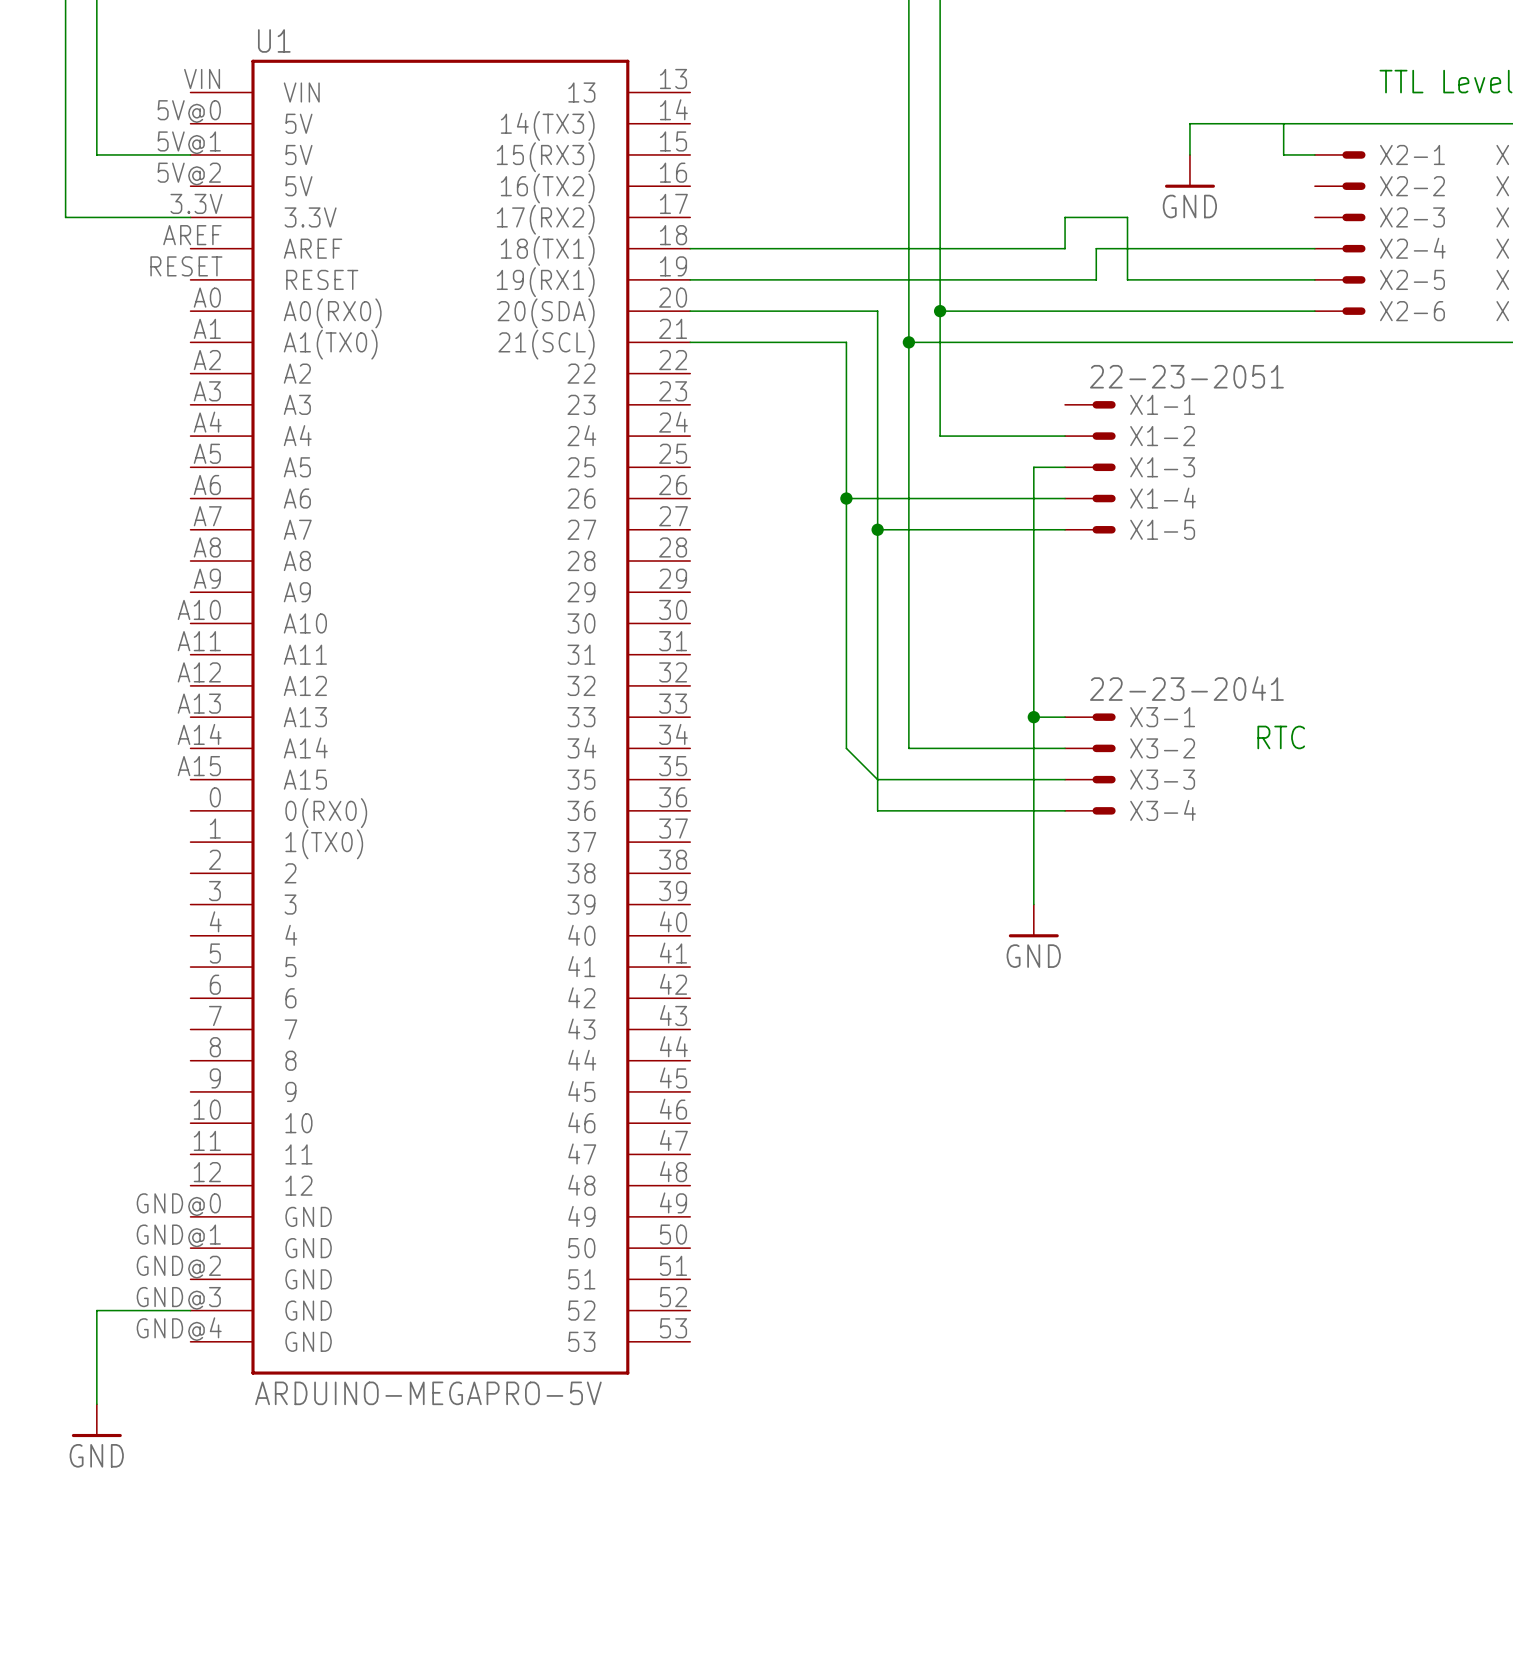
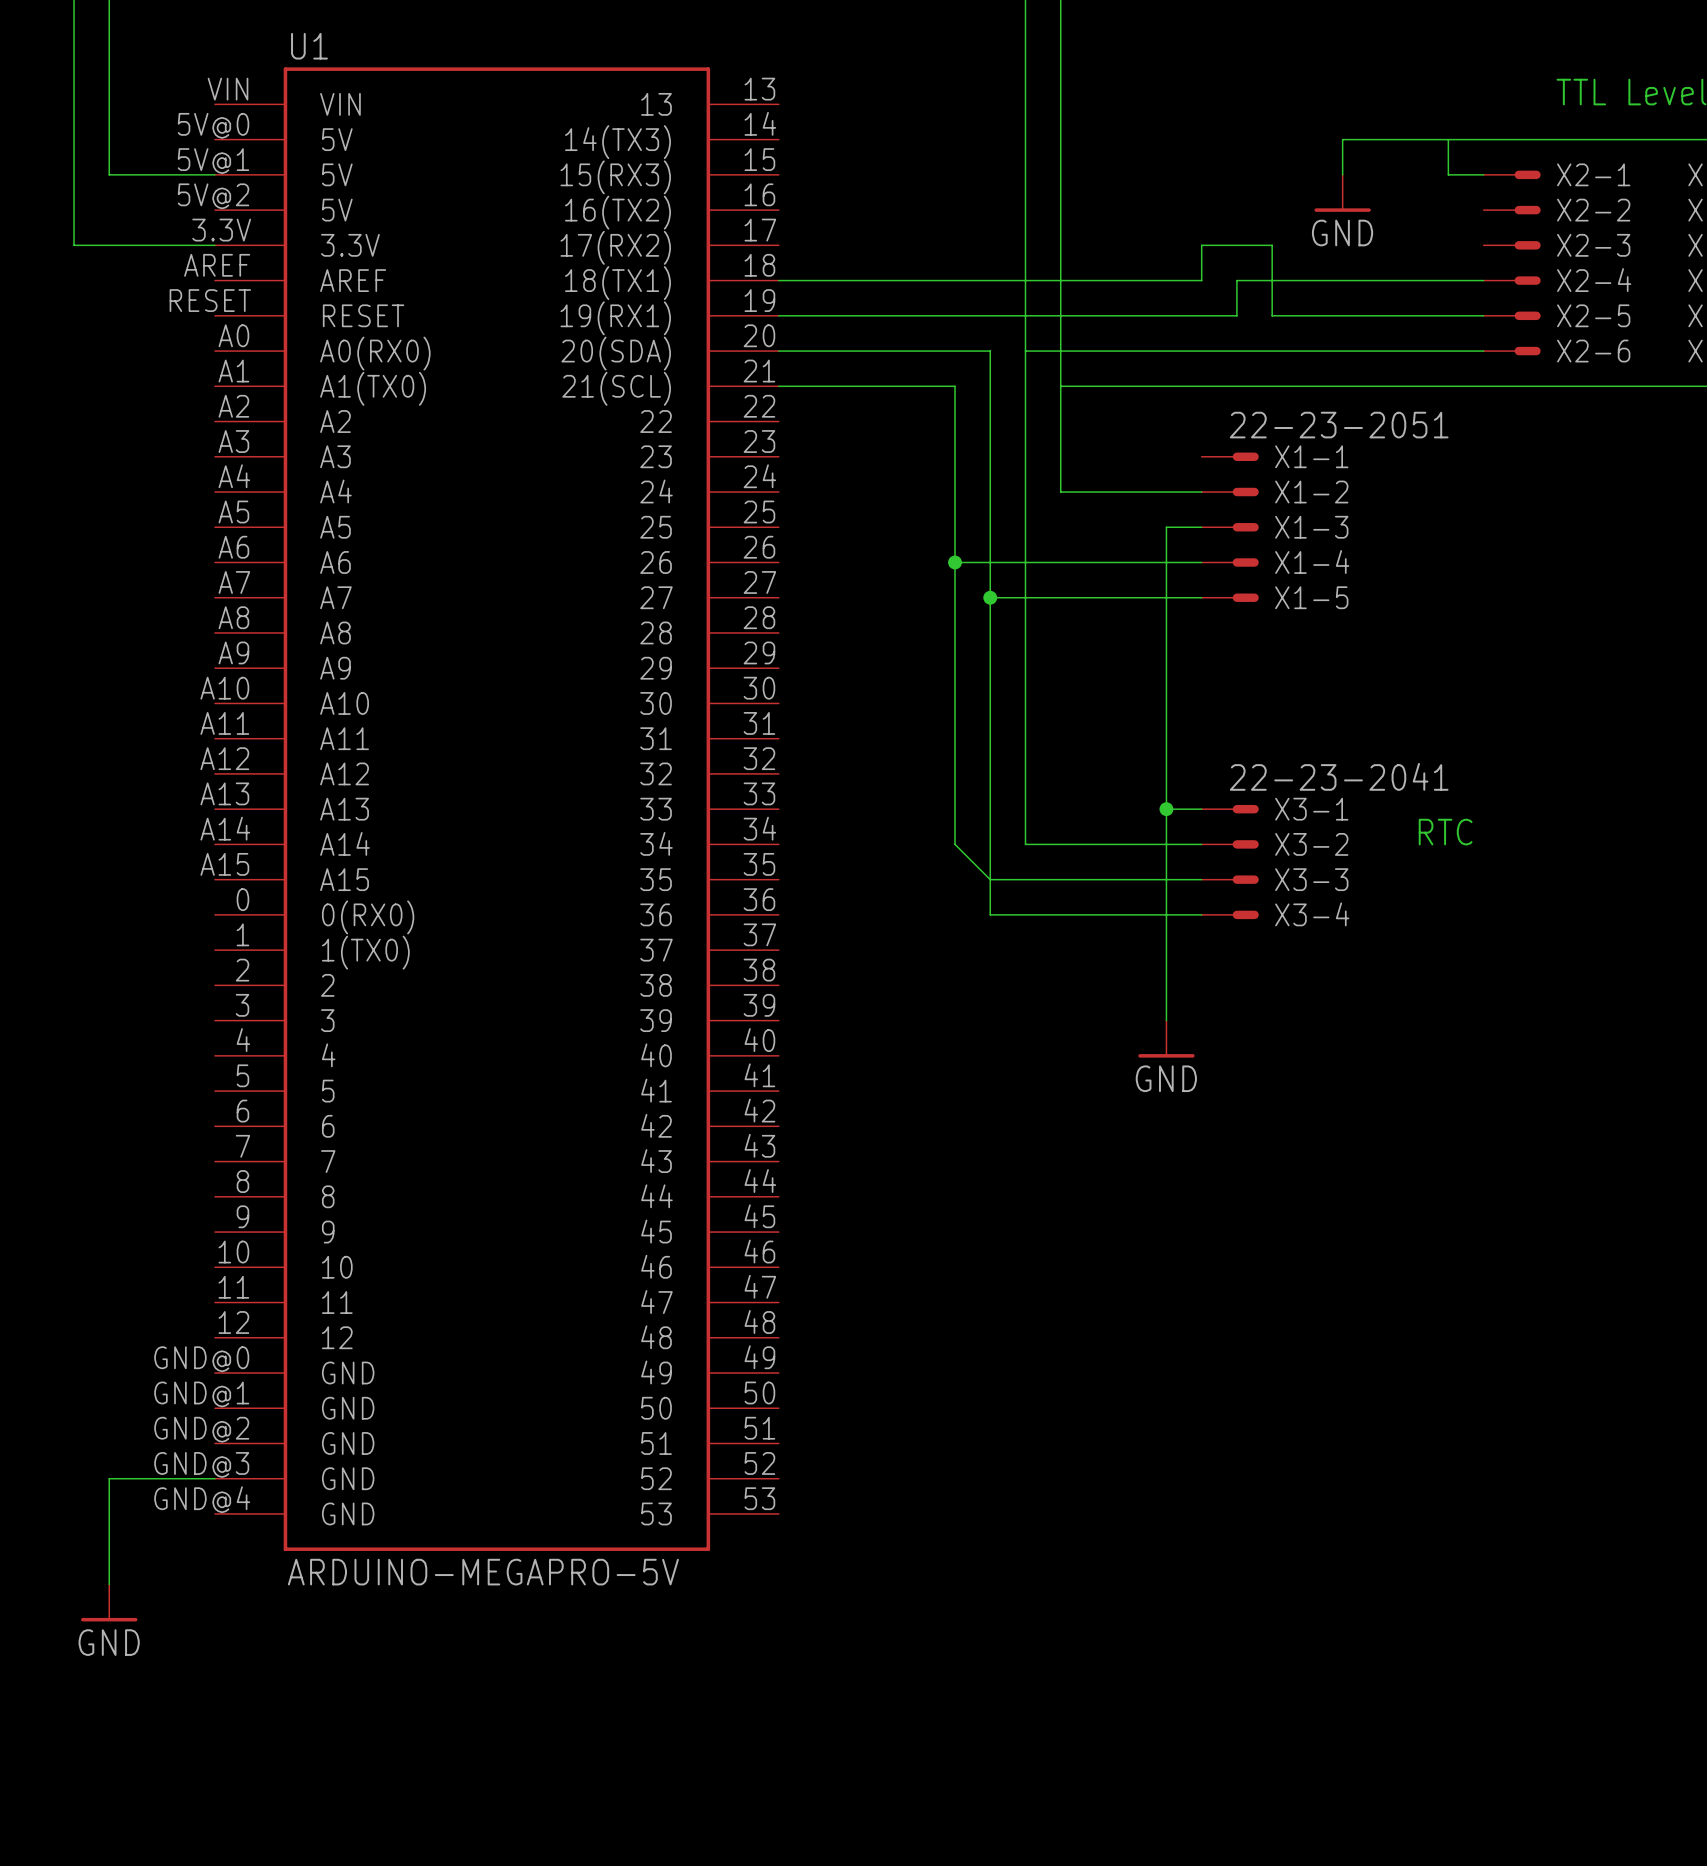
junction: (940, 311) -> none
wire: (908, 342) (940, 342) -> (1025, 351) (1060, 351)
junction: (908, 342) -> none

